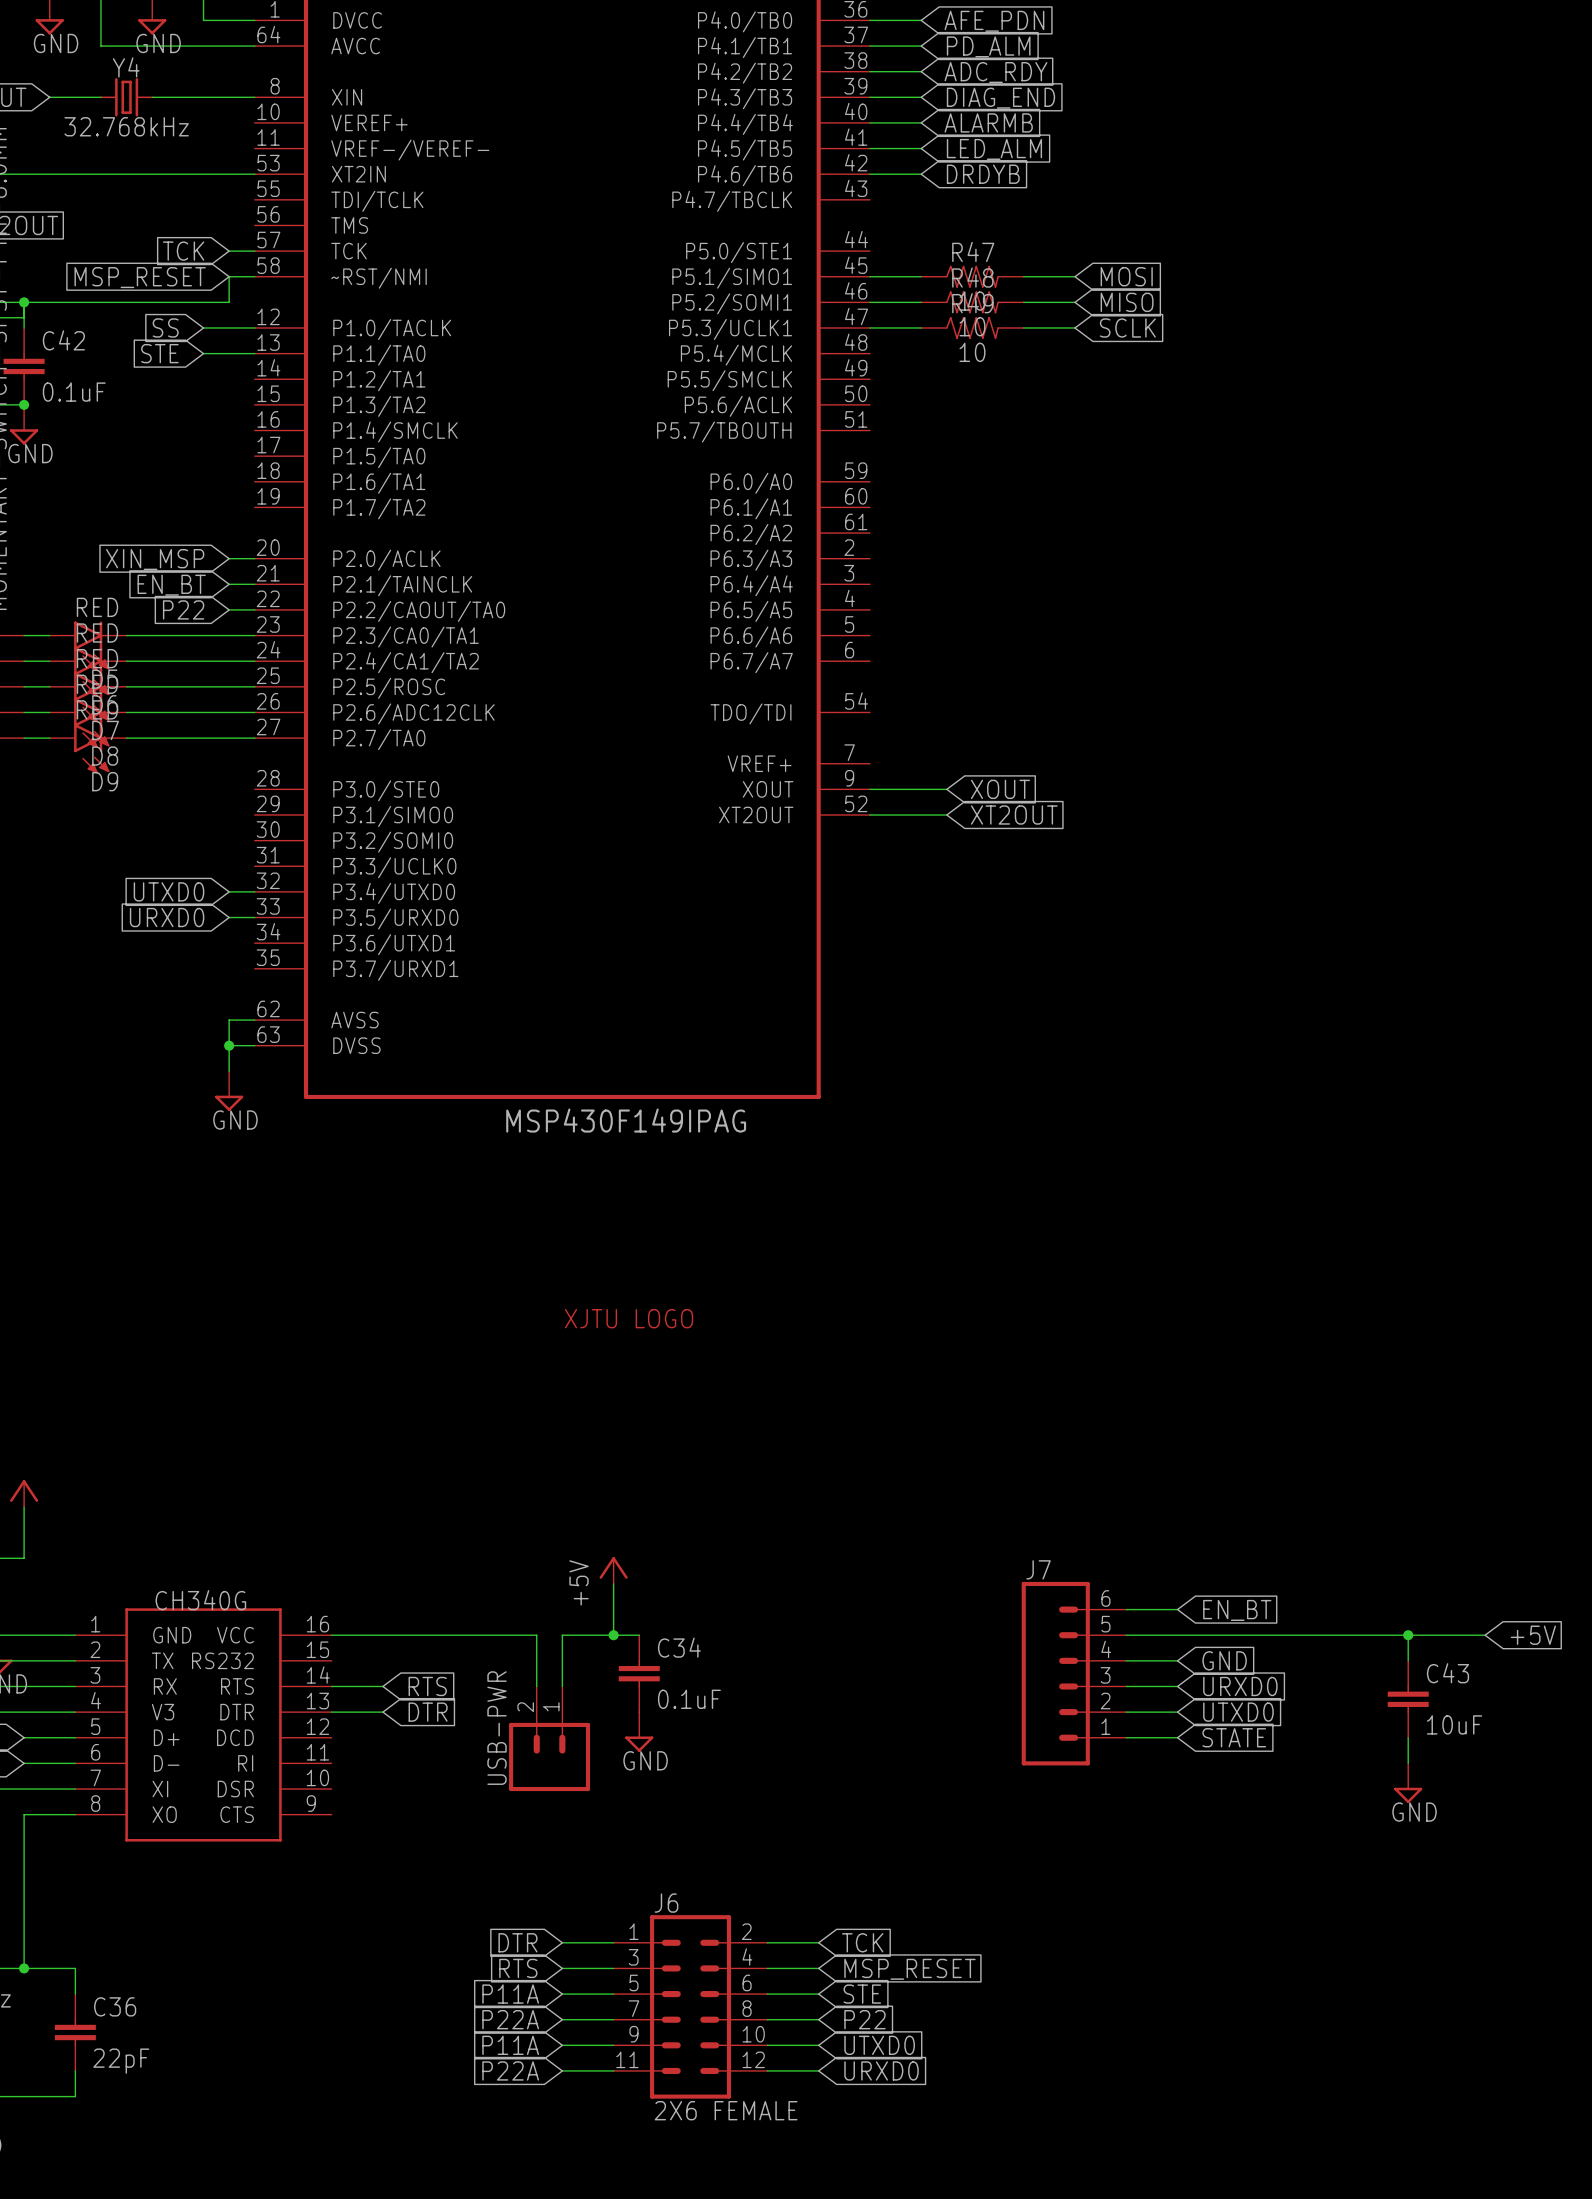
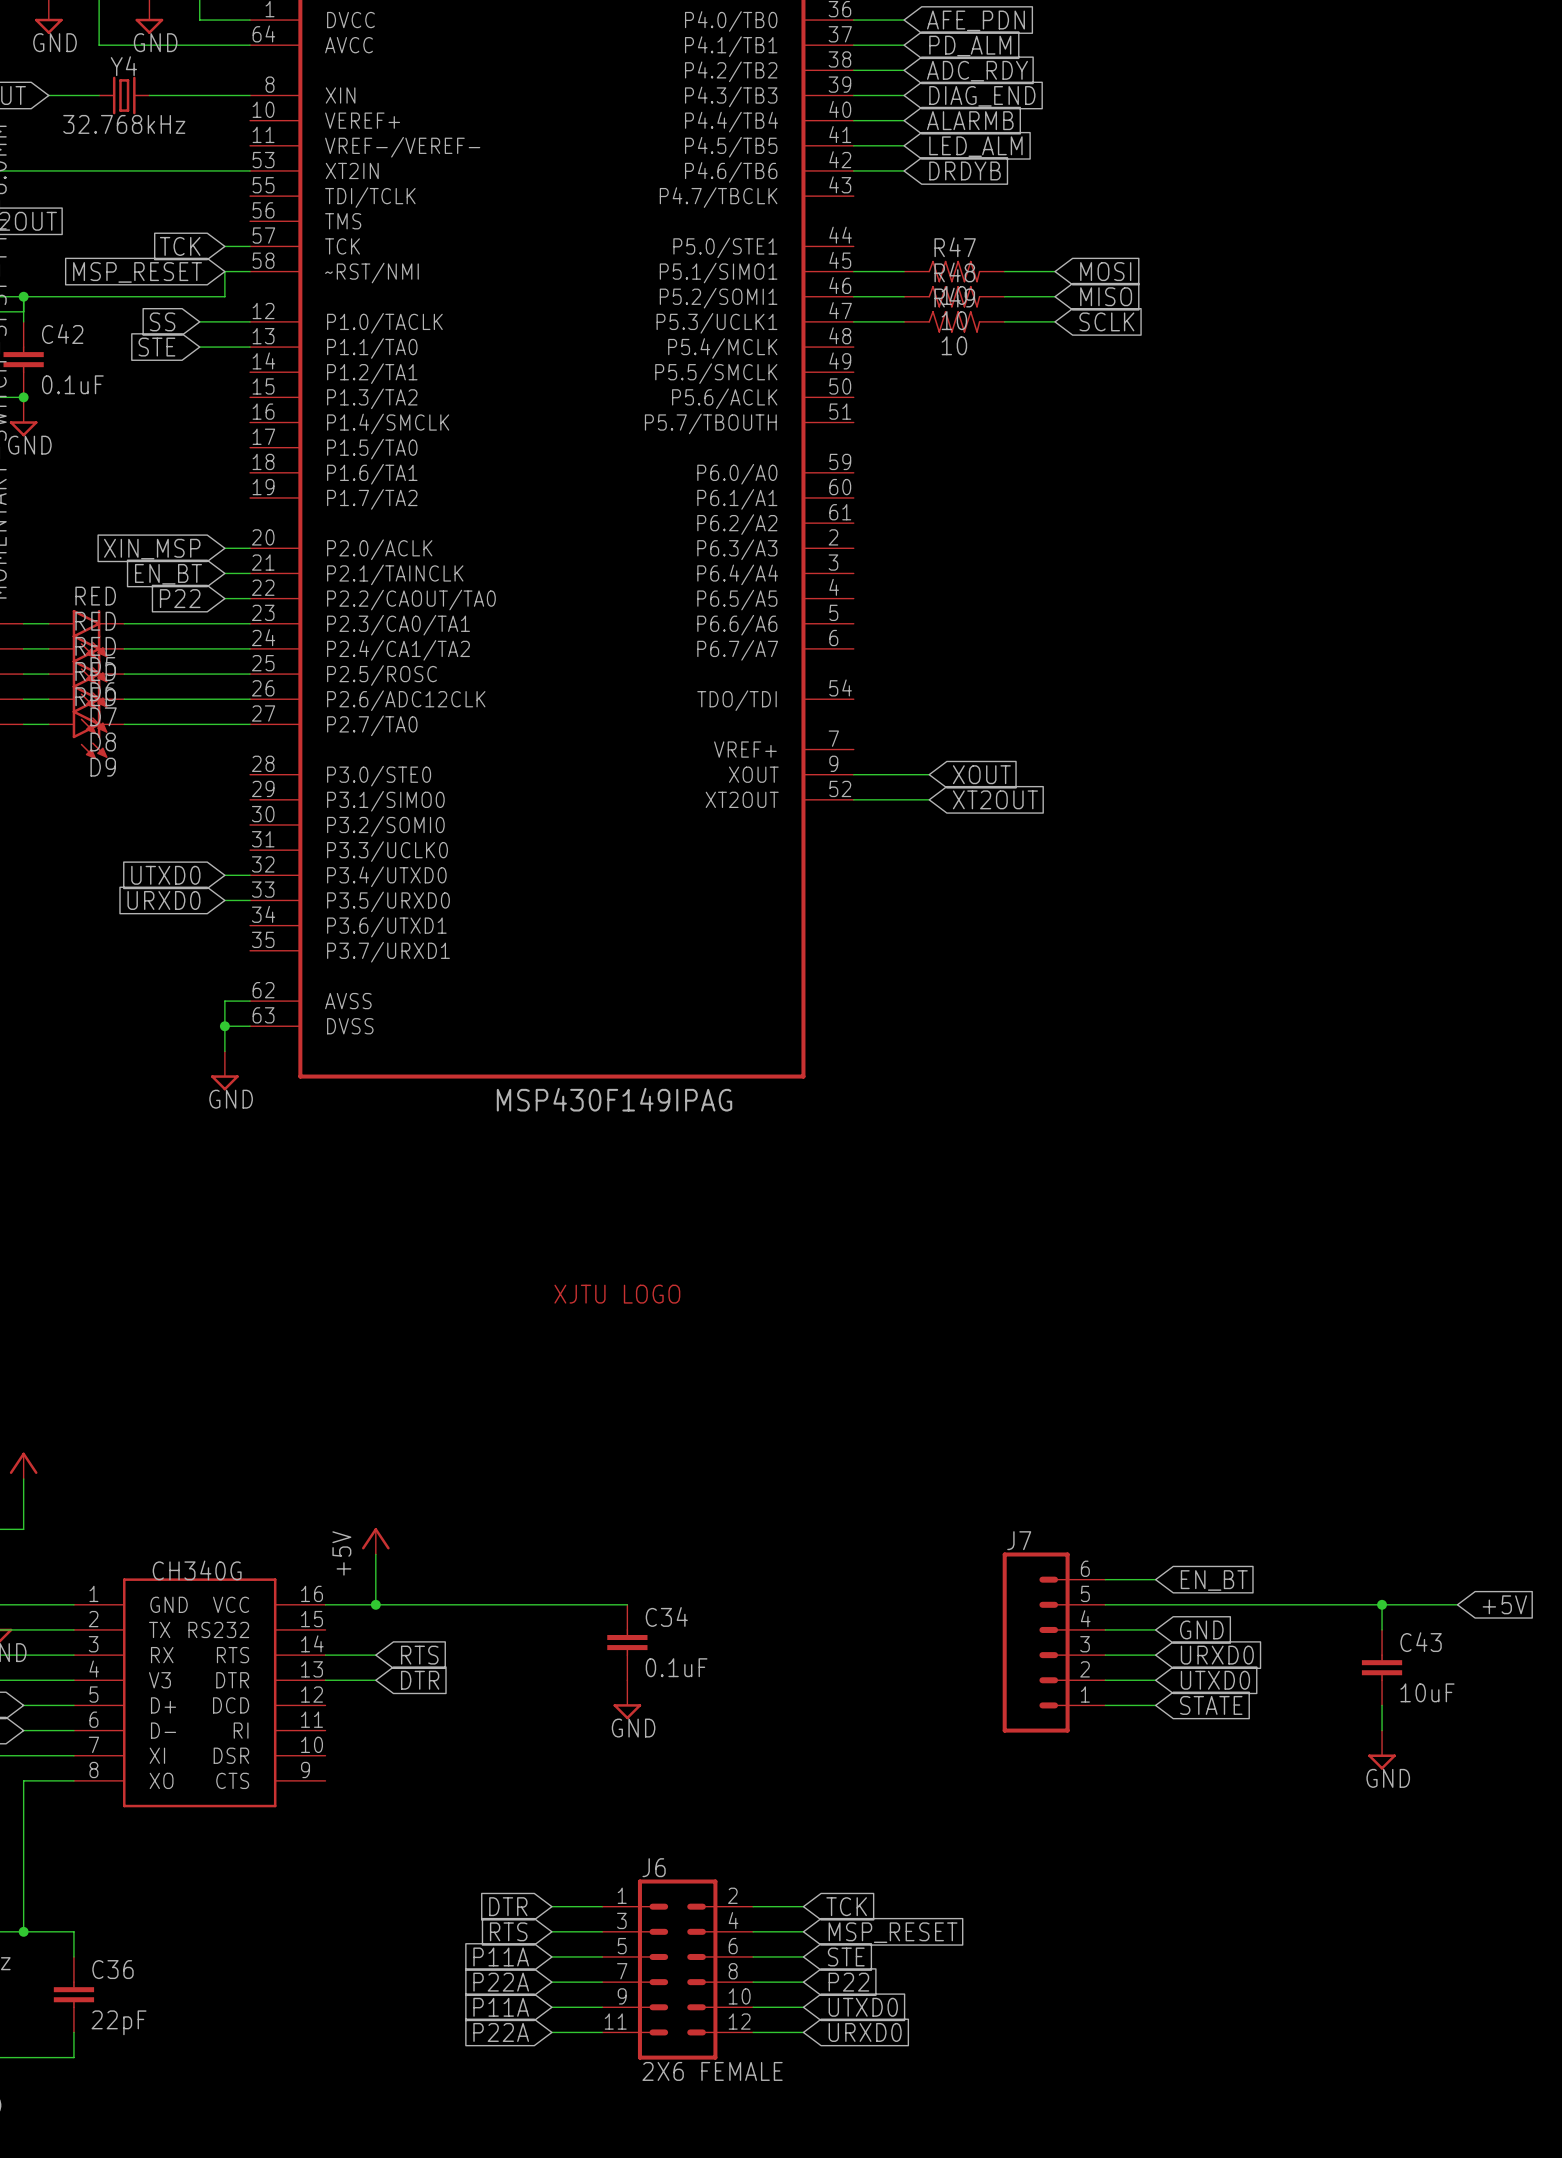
power symbol position: +5V (613, 1570) -> +5V (375, 1541)
wire: (613, 1583) (613, 1635) -> none
junction: none -> (375, 1604)
wire: (536, 1635) (536, 1686) -> (526, 1604) (551, 1604)
wire: (562, 1635) (562, 1686) -> (375, 1554) (375, 1604)
junction: (613, 1635) -> none
USB-PWR: (549, 1738) -> none

